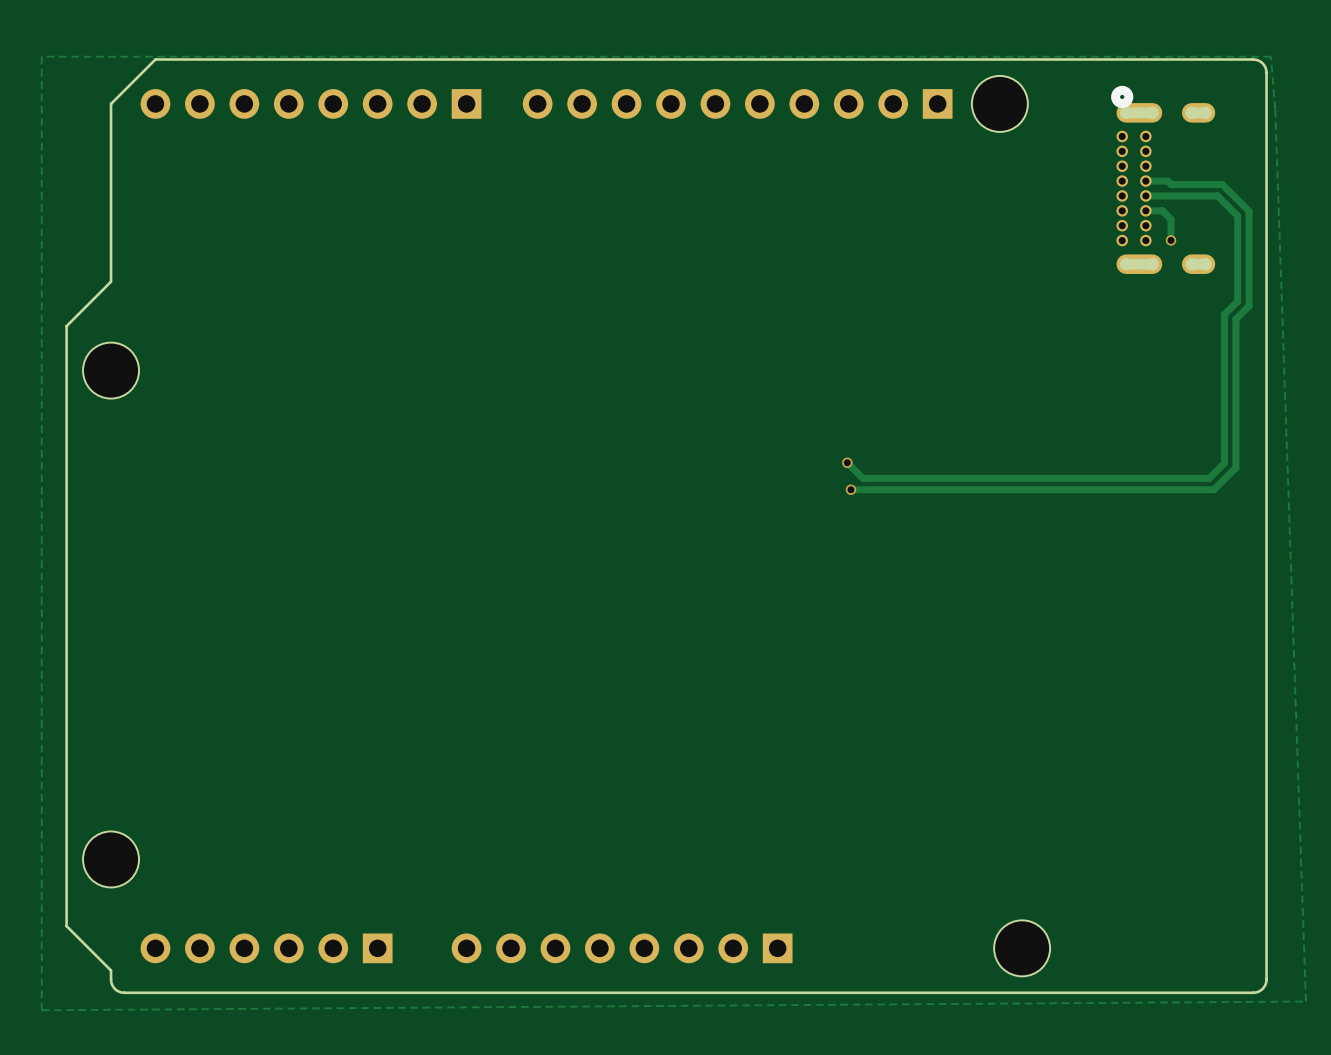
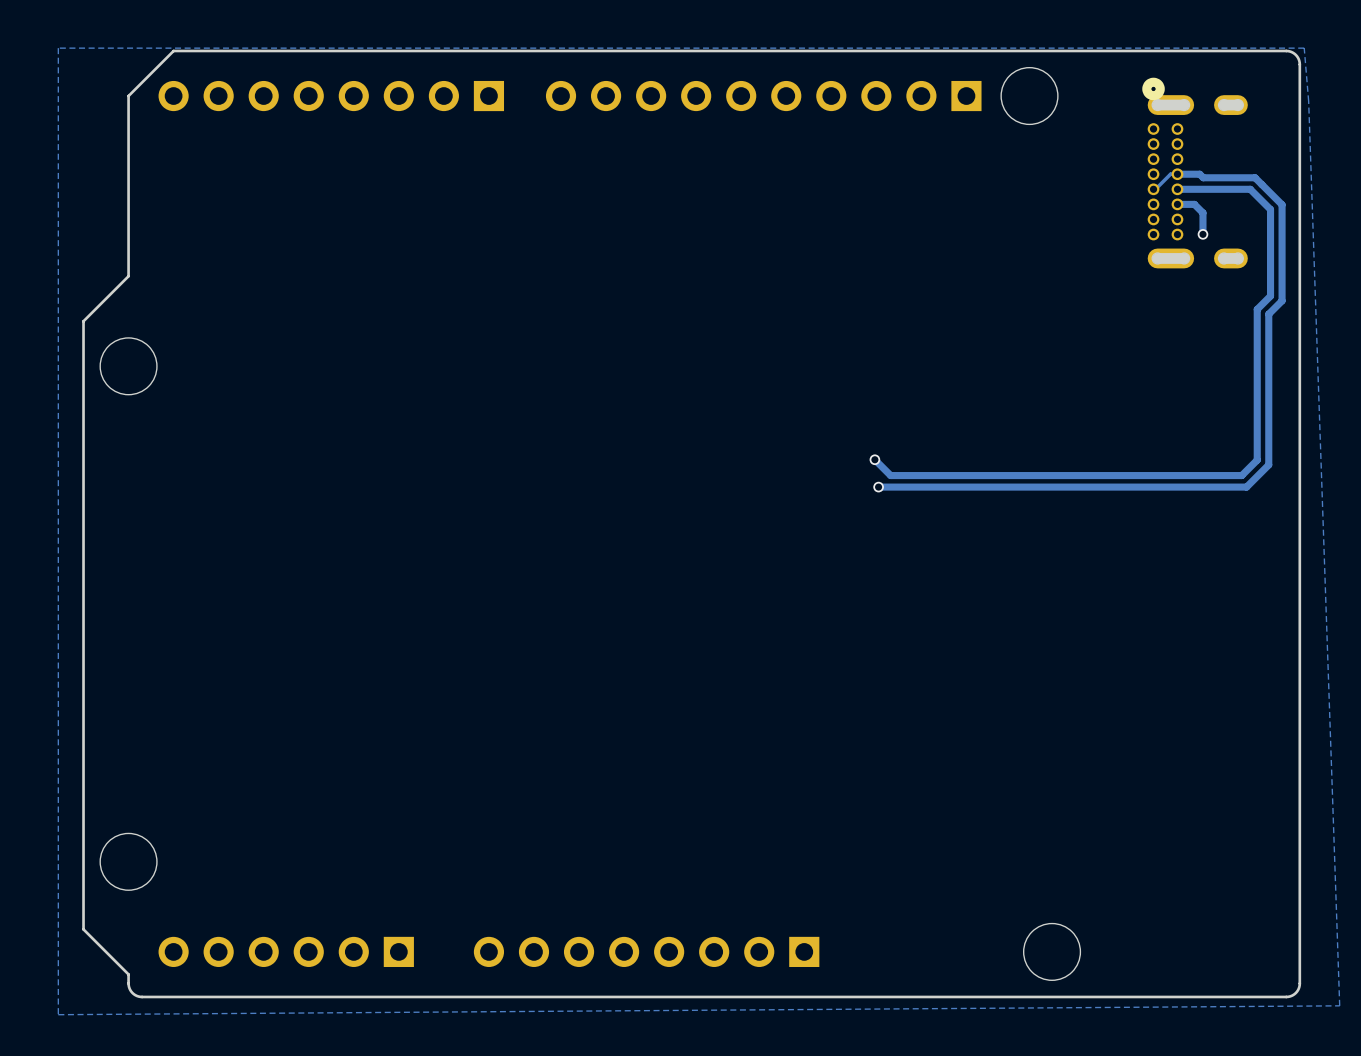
track: none -> (1177, 174) (1170, 174) (1153, 189)

